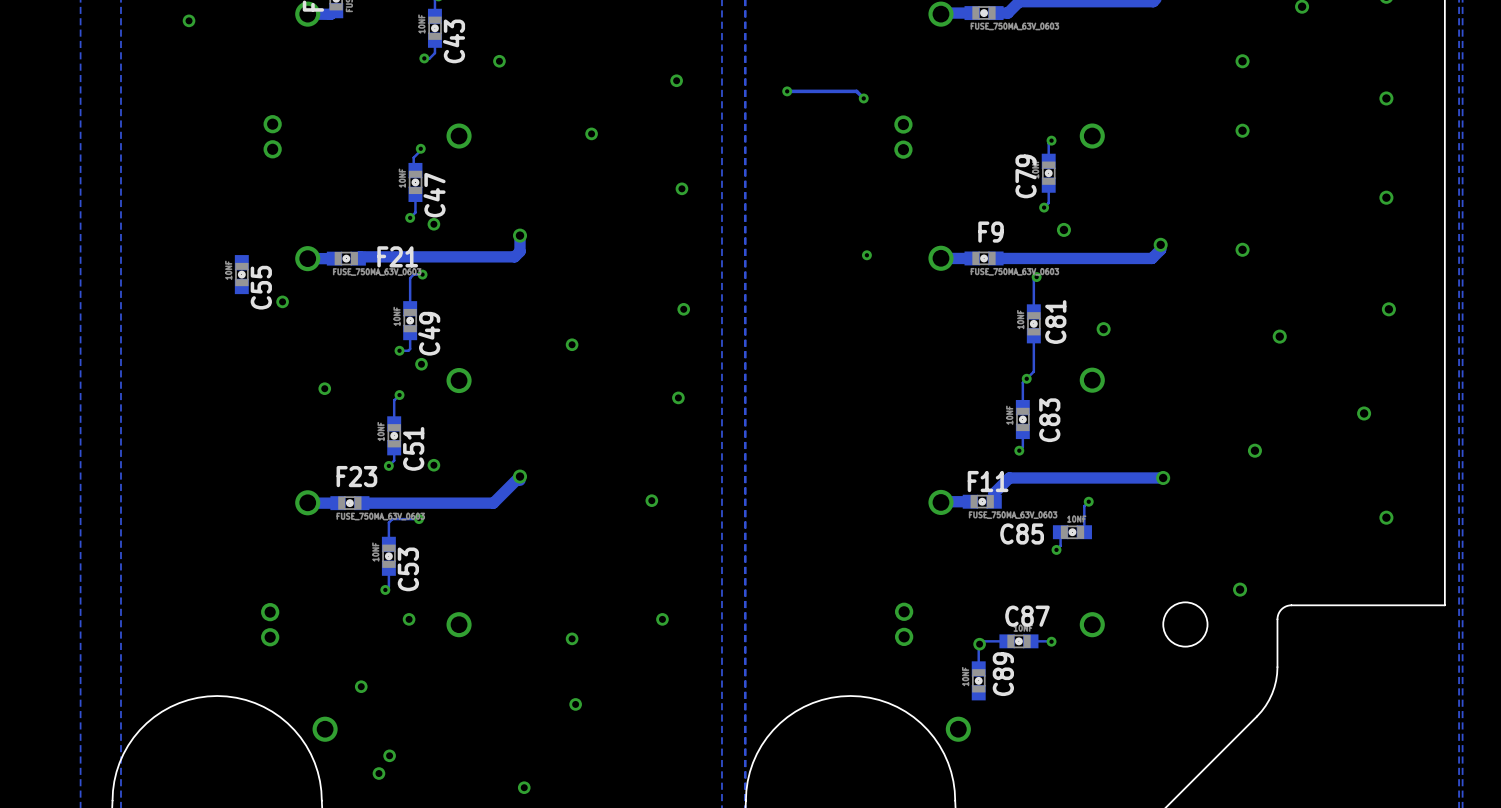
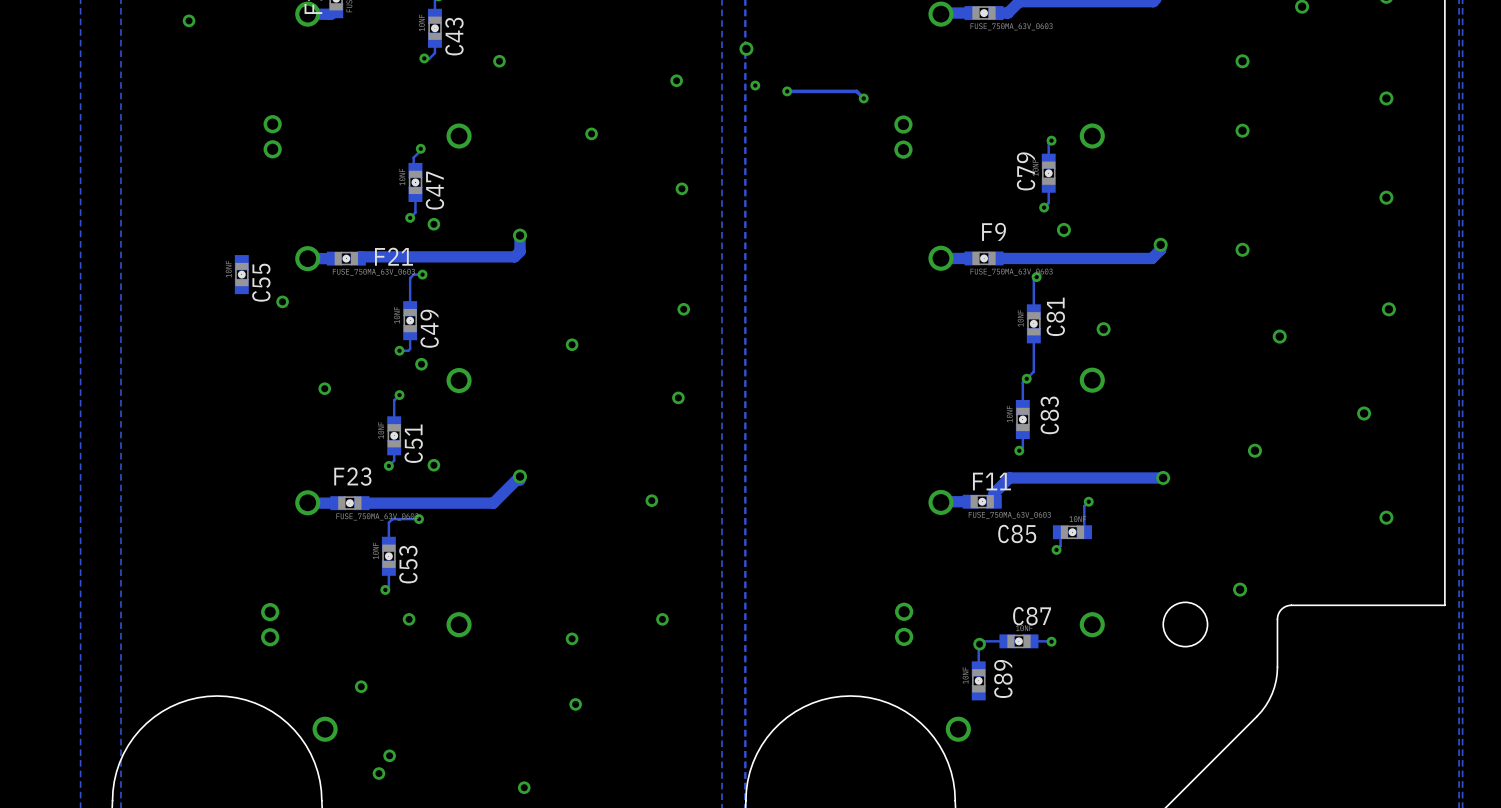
via: none -> (746, 48)
via: none -> (755, 85)
via: (866, 255) -> none

